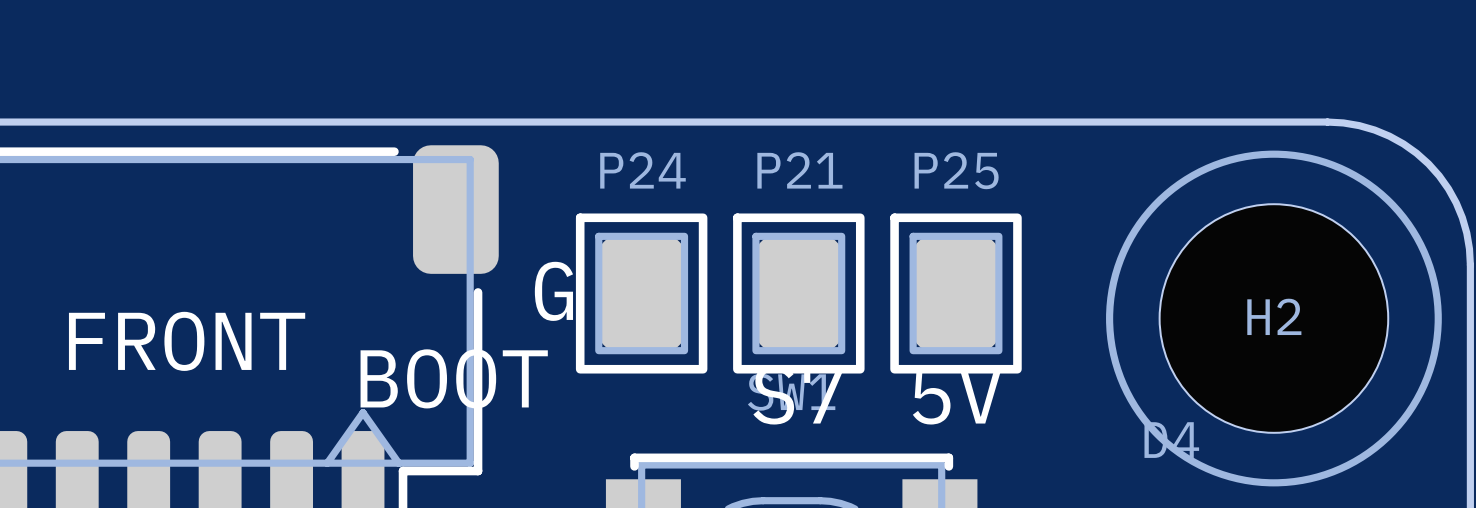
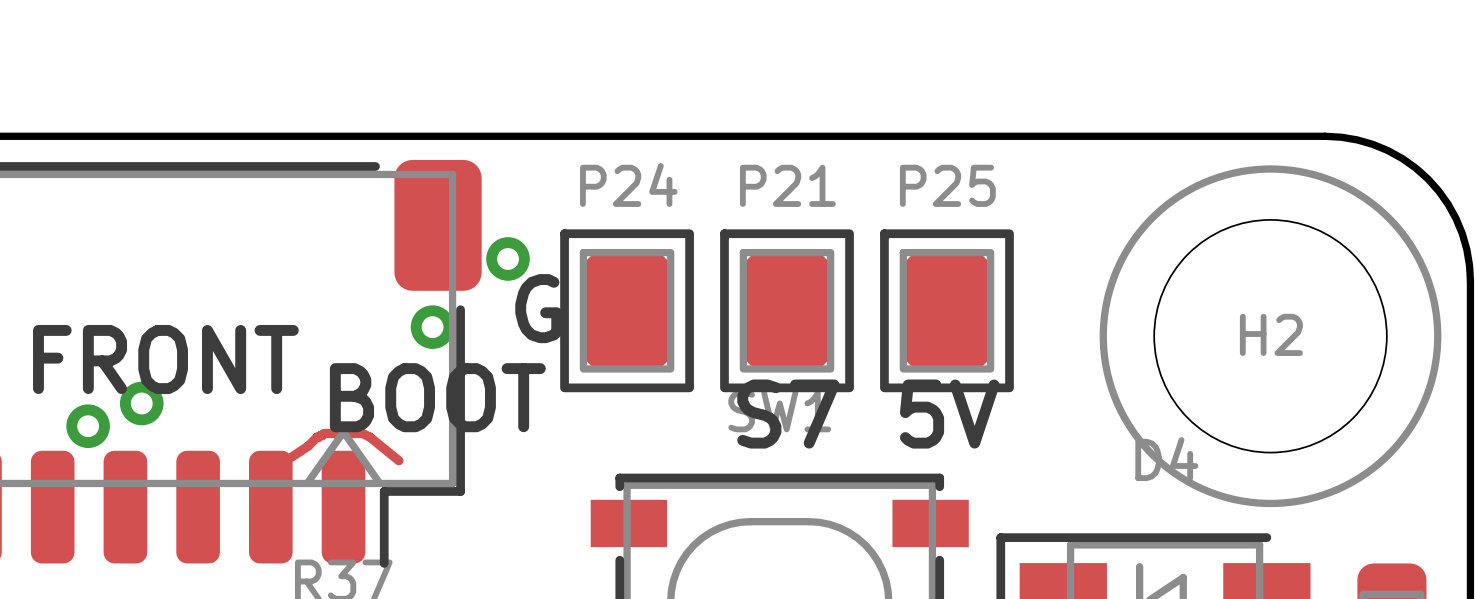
via: none -> (508, 258)
via: none -> (432, 327)
via: none -> (141, 403)
via: none -> (88, 426)
track: none -> (291, 457) (324, 433) (362, 433) (398, 460)

